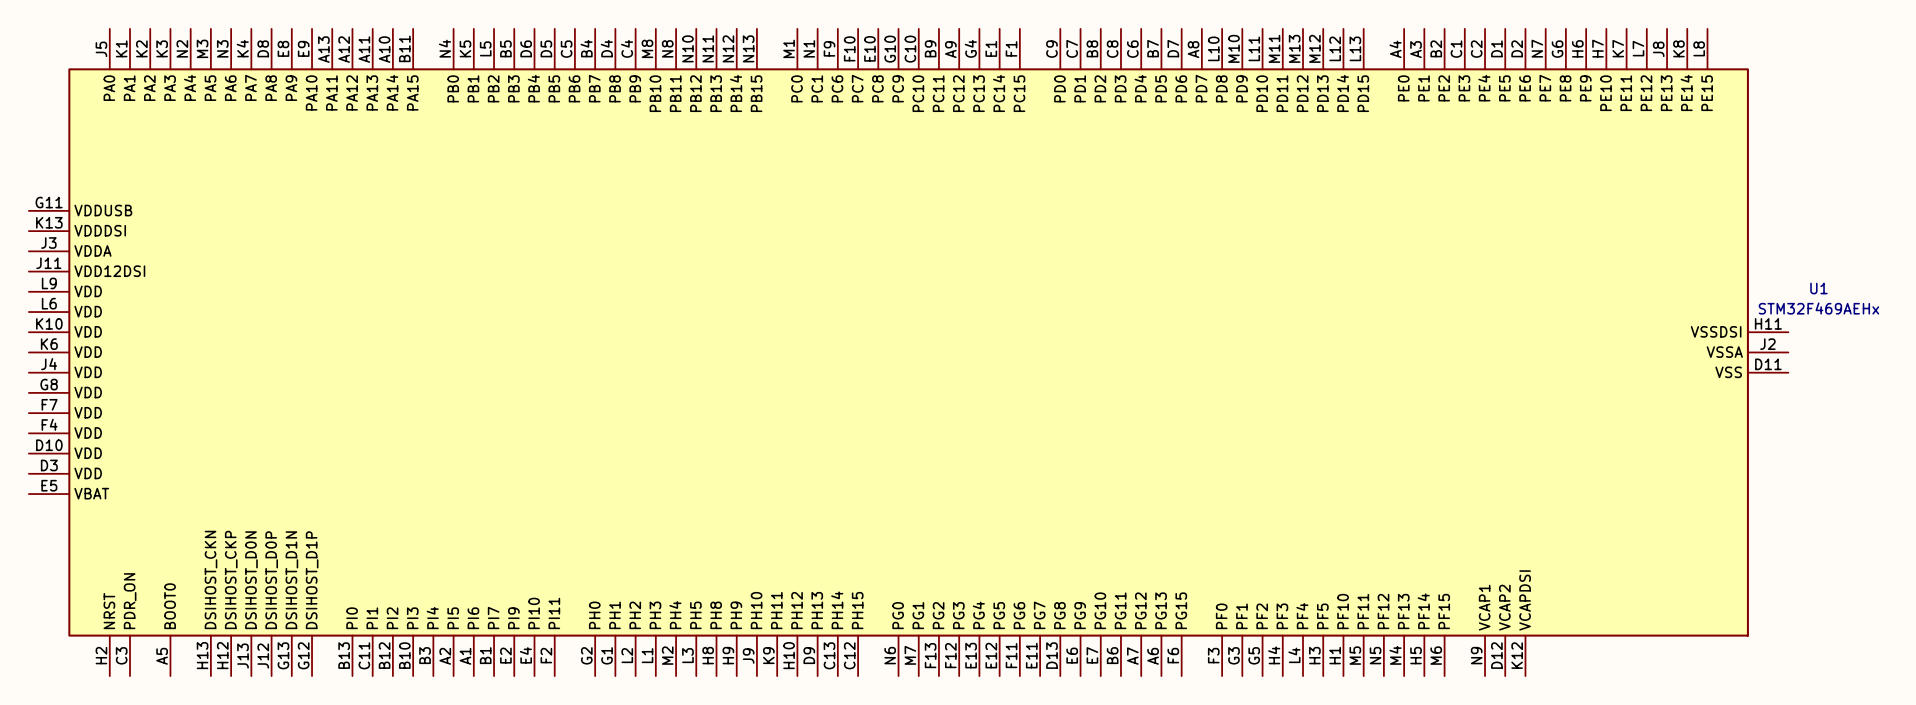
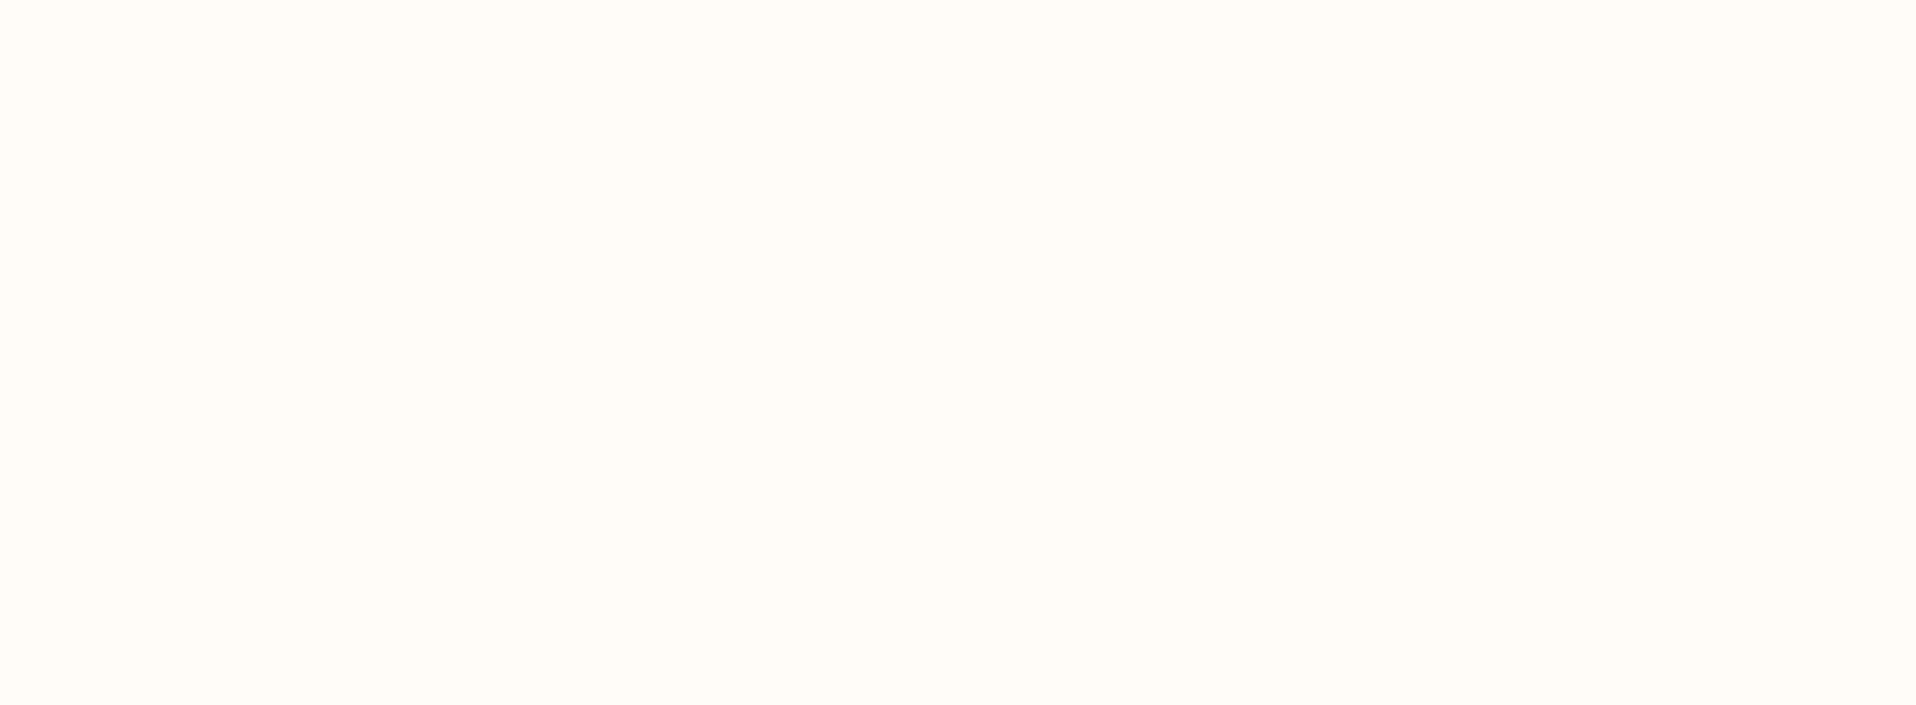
U1: STM32F469AEHx (908, 352) -> none

